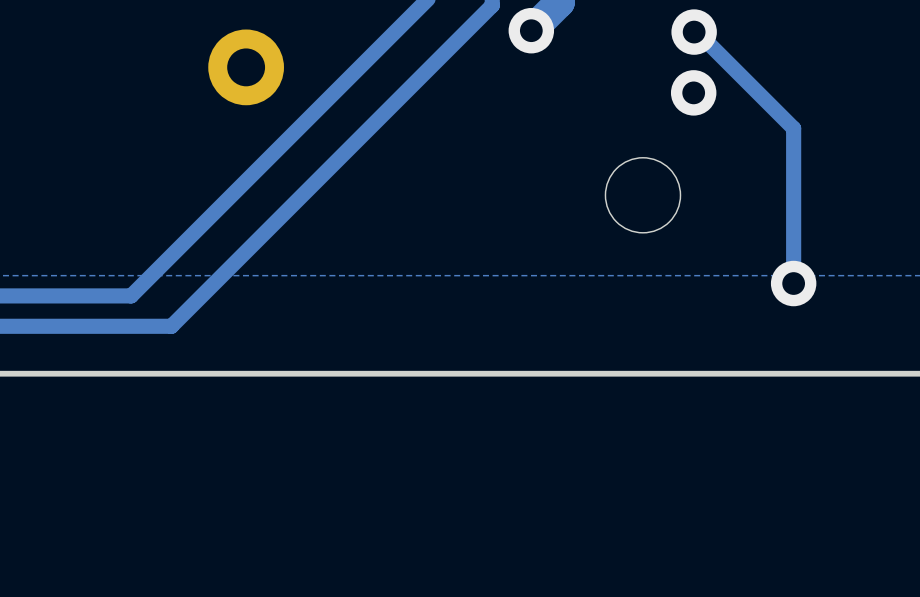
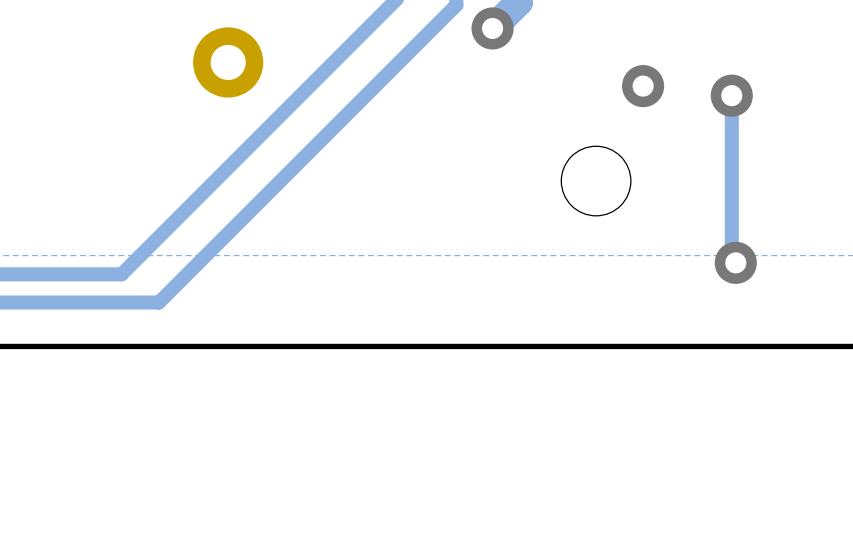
track: (694, 32) (697, 32) (793, 128) (793, 283) -> none
via position: (694, 32) -> (731, 95)
track: none -> (731, 95) (731, 260)

